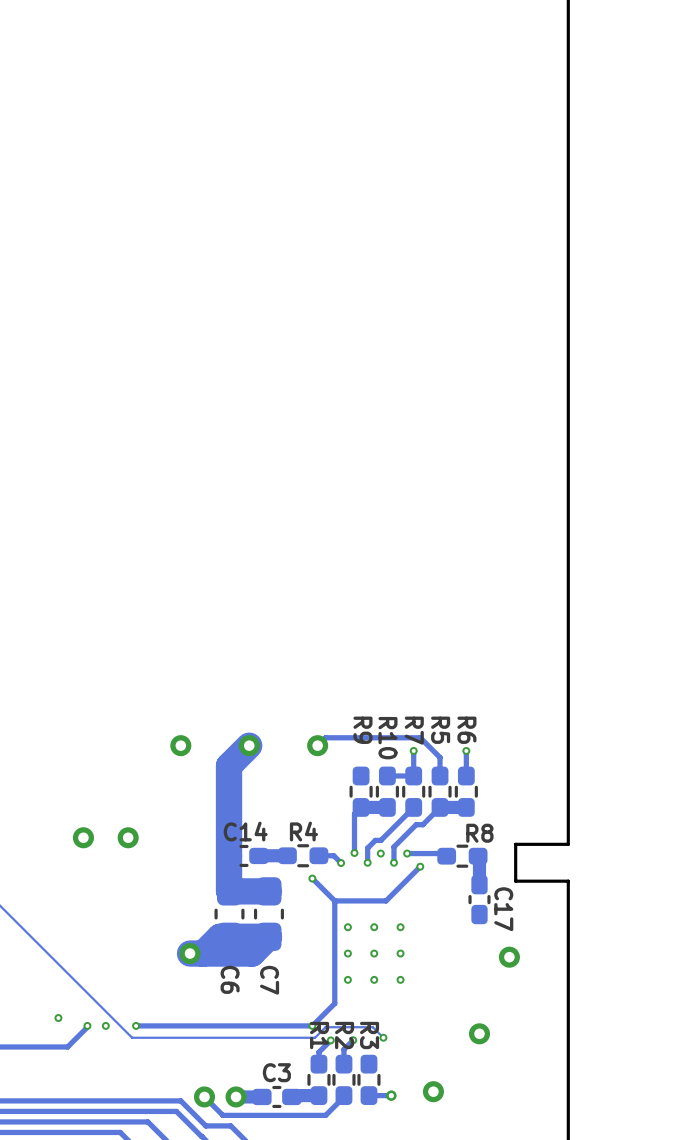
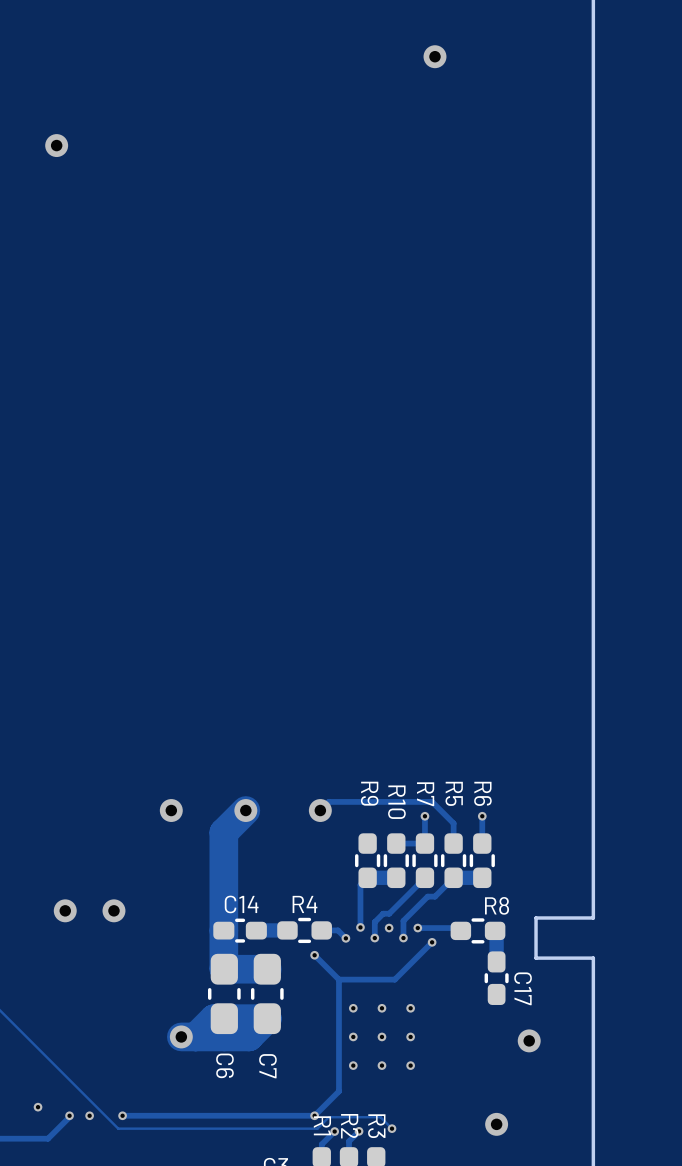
via: none -> (434, 56)
via: none -> (56, 145)

